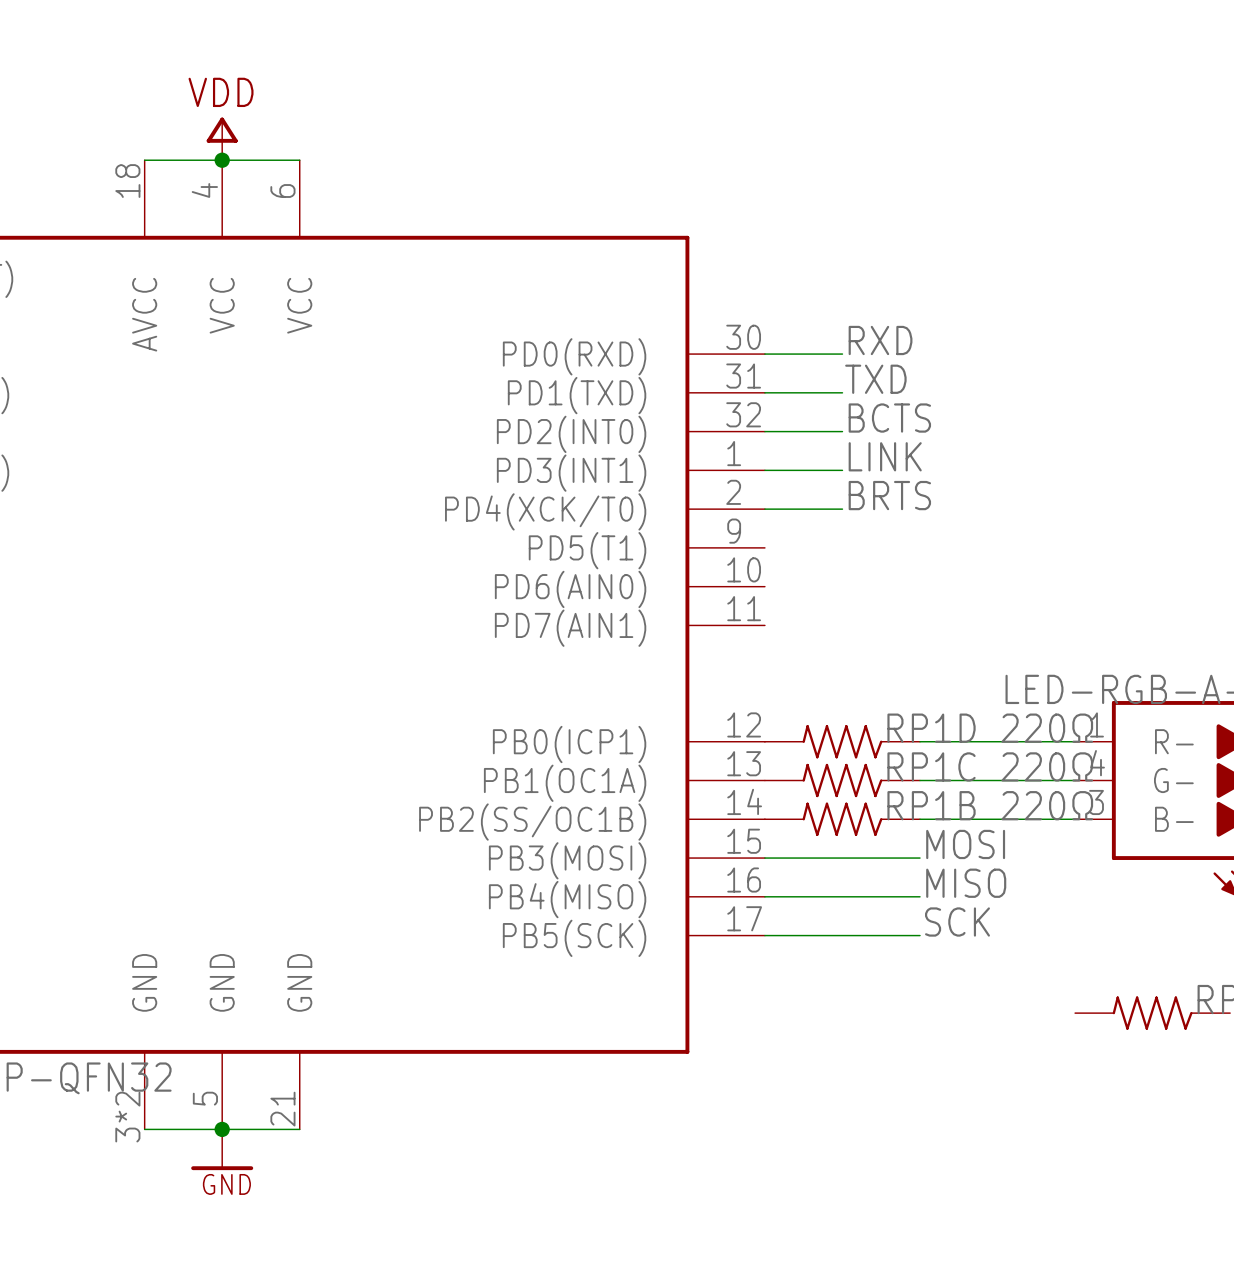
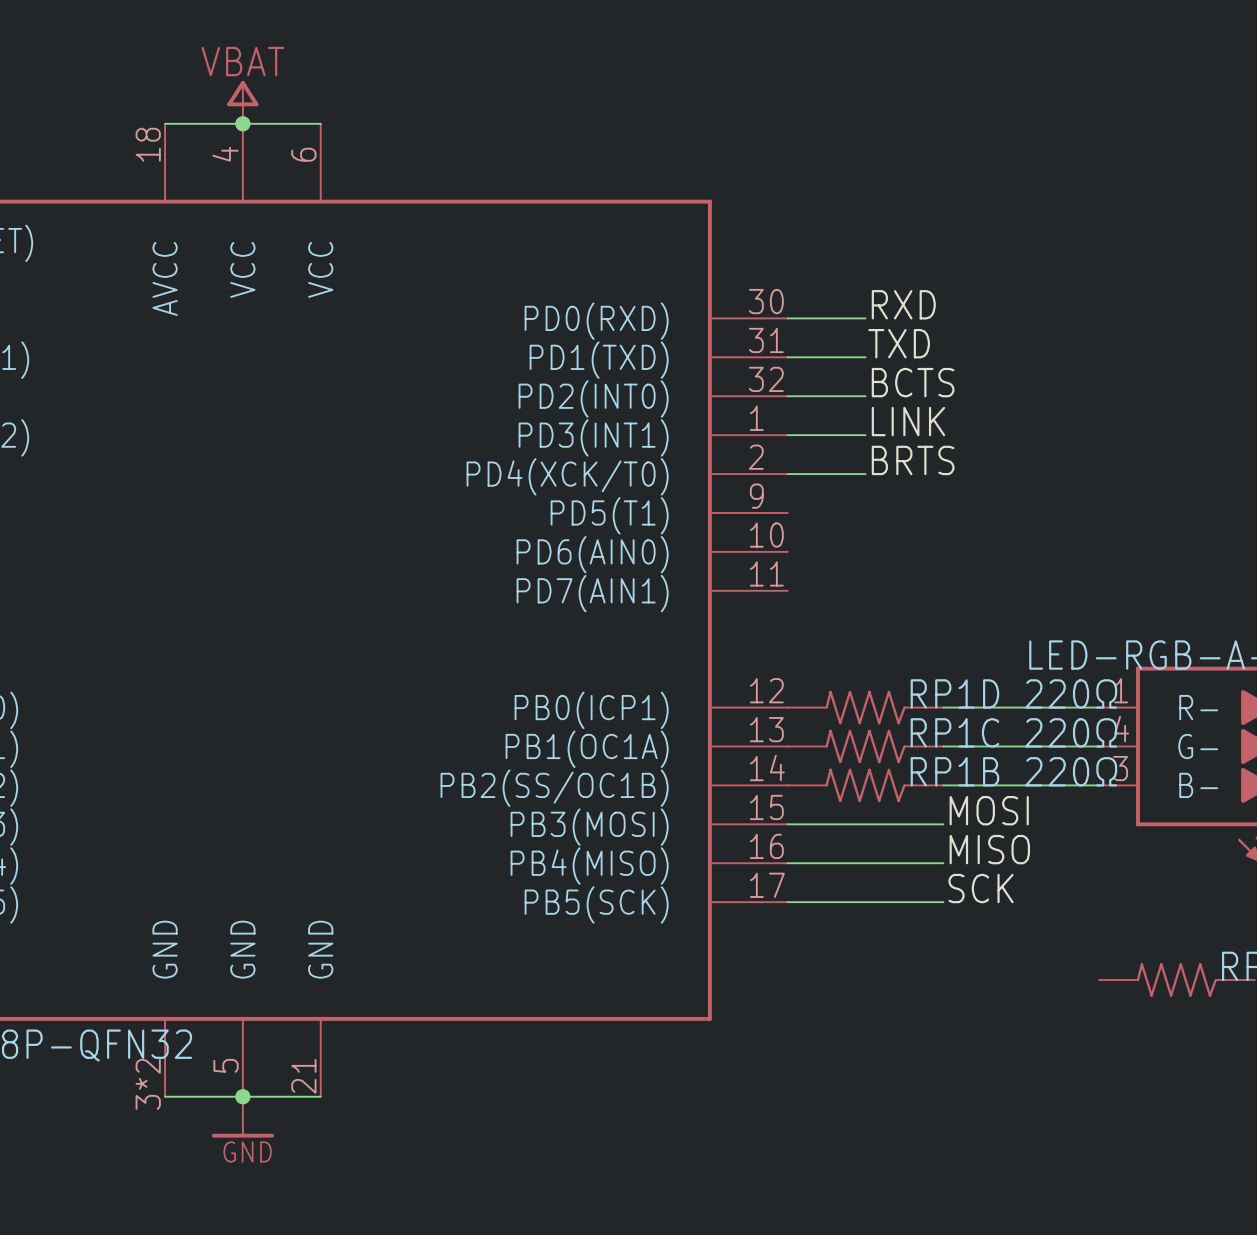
power symbol text: VDD (221, 92) -> none
power symbol text: none -> VBAT (242, 61)

